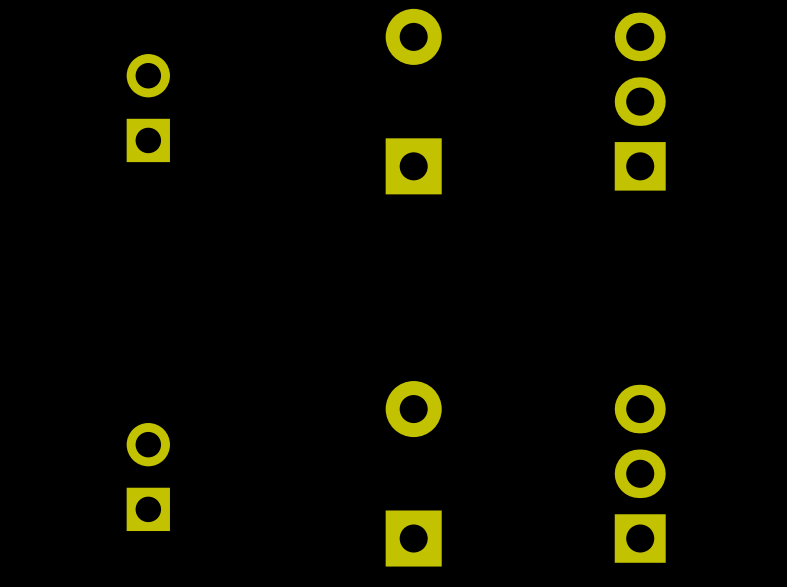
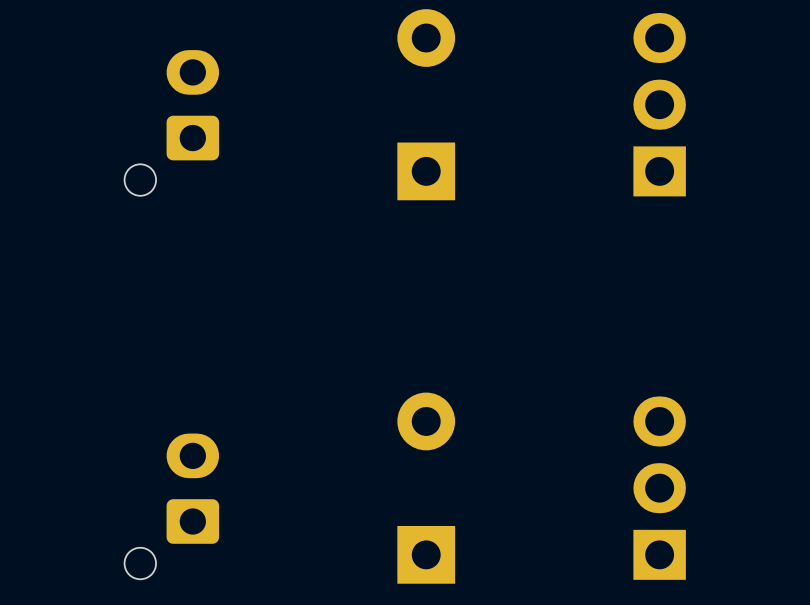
part footprint: [126, 54, 170, 163] -> [124, 50, 220, 196]
part footprint: [126, 423, 170, 532] -> [124, 433, 220, 580]

